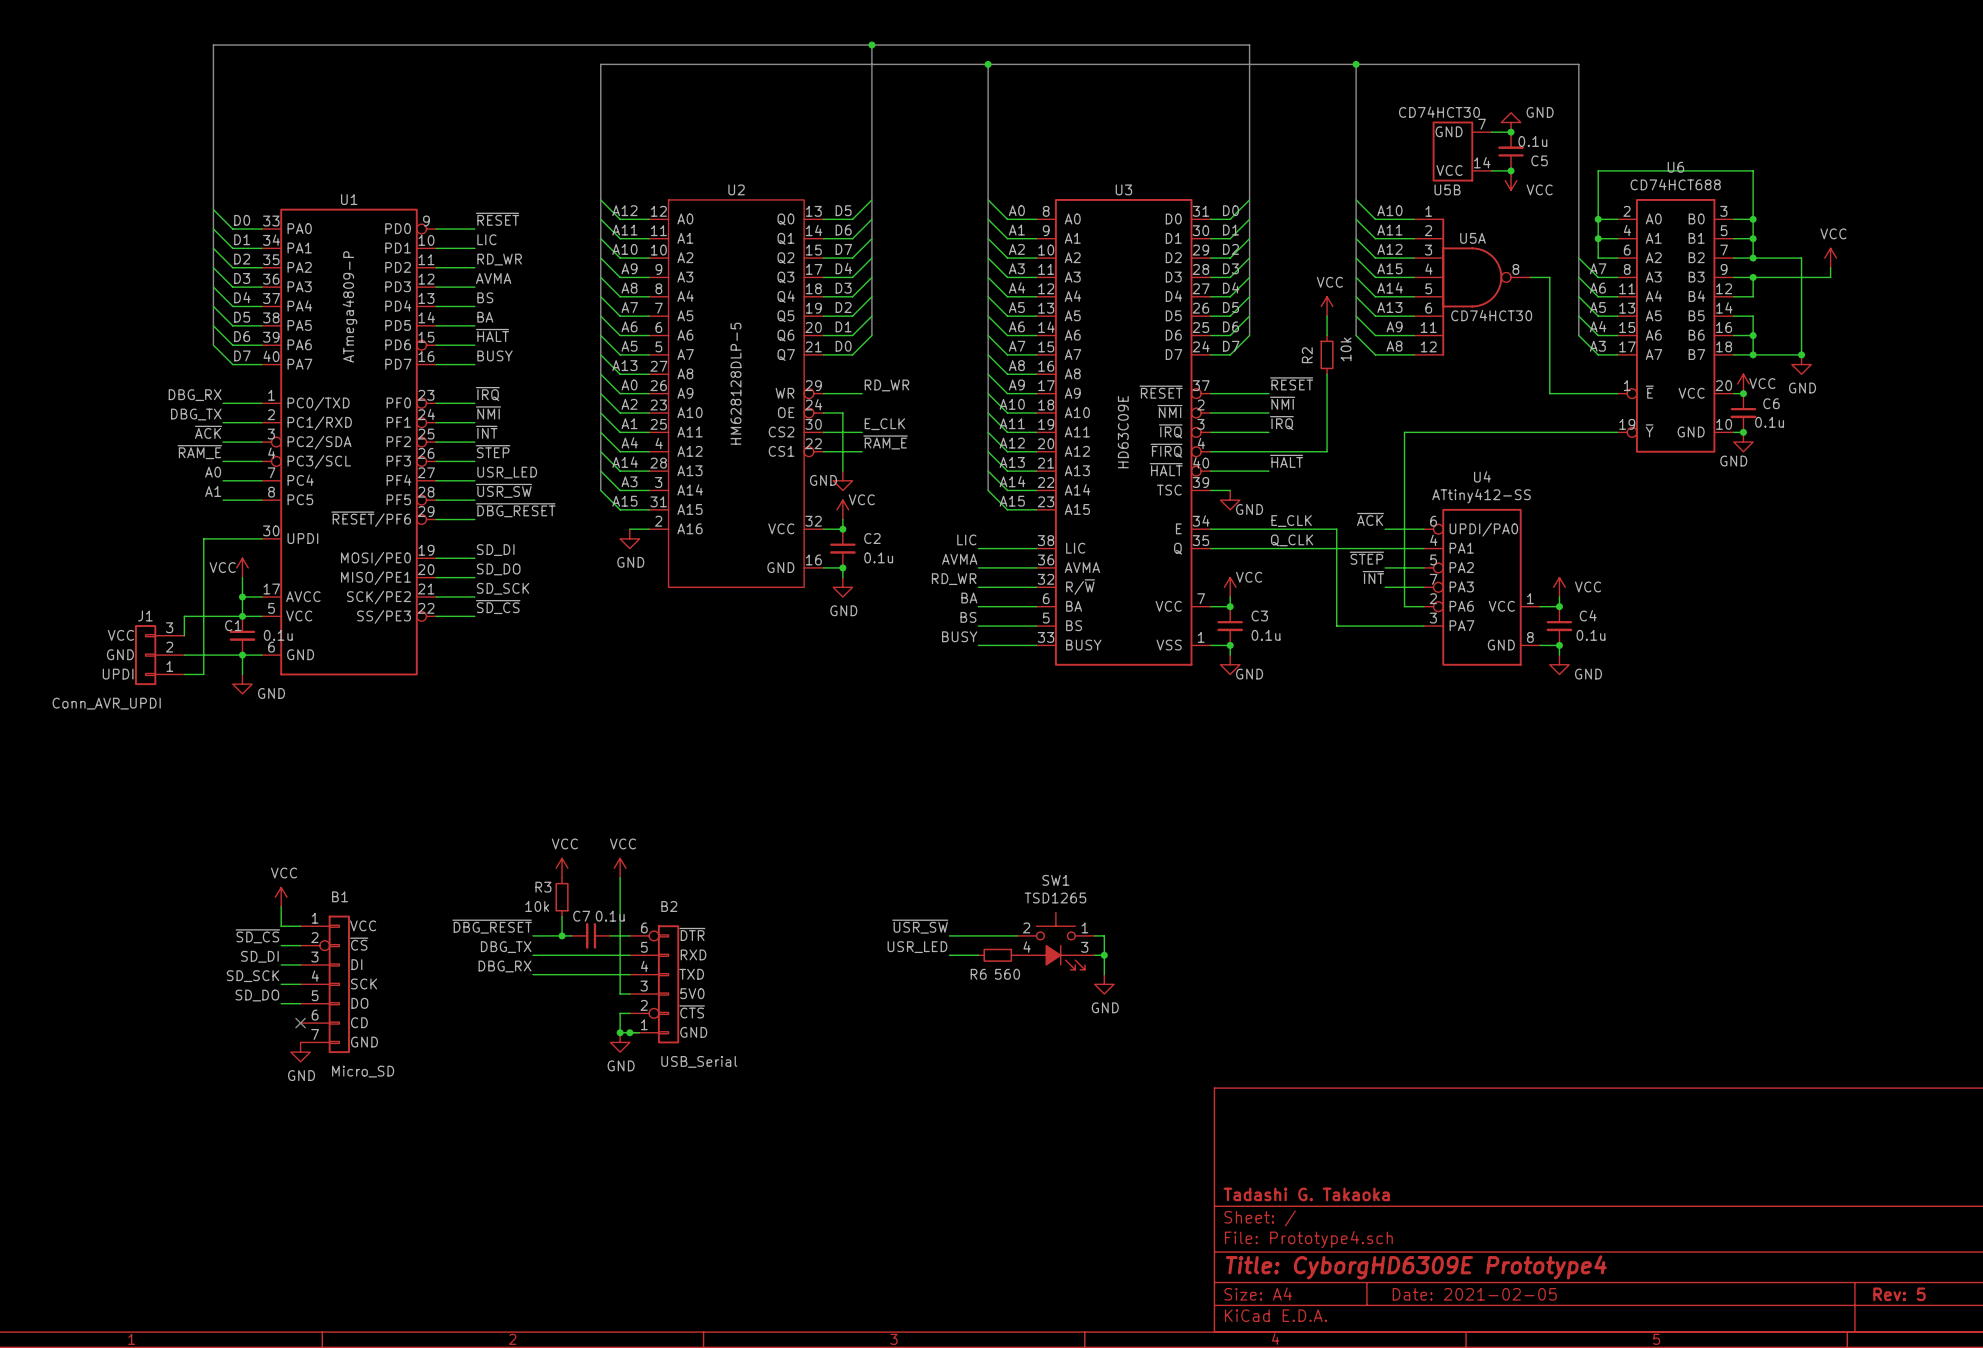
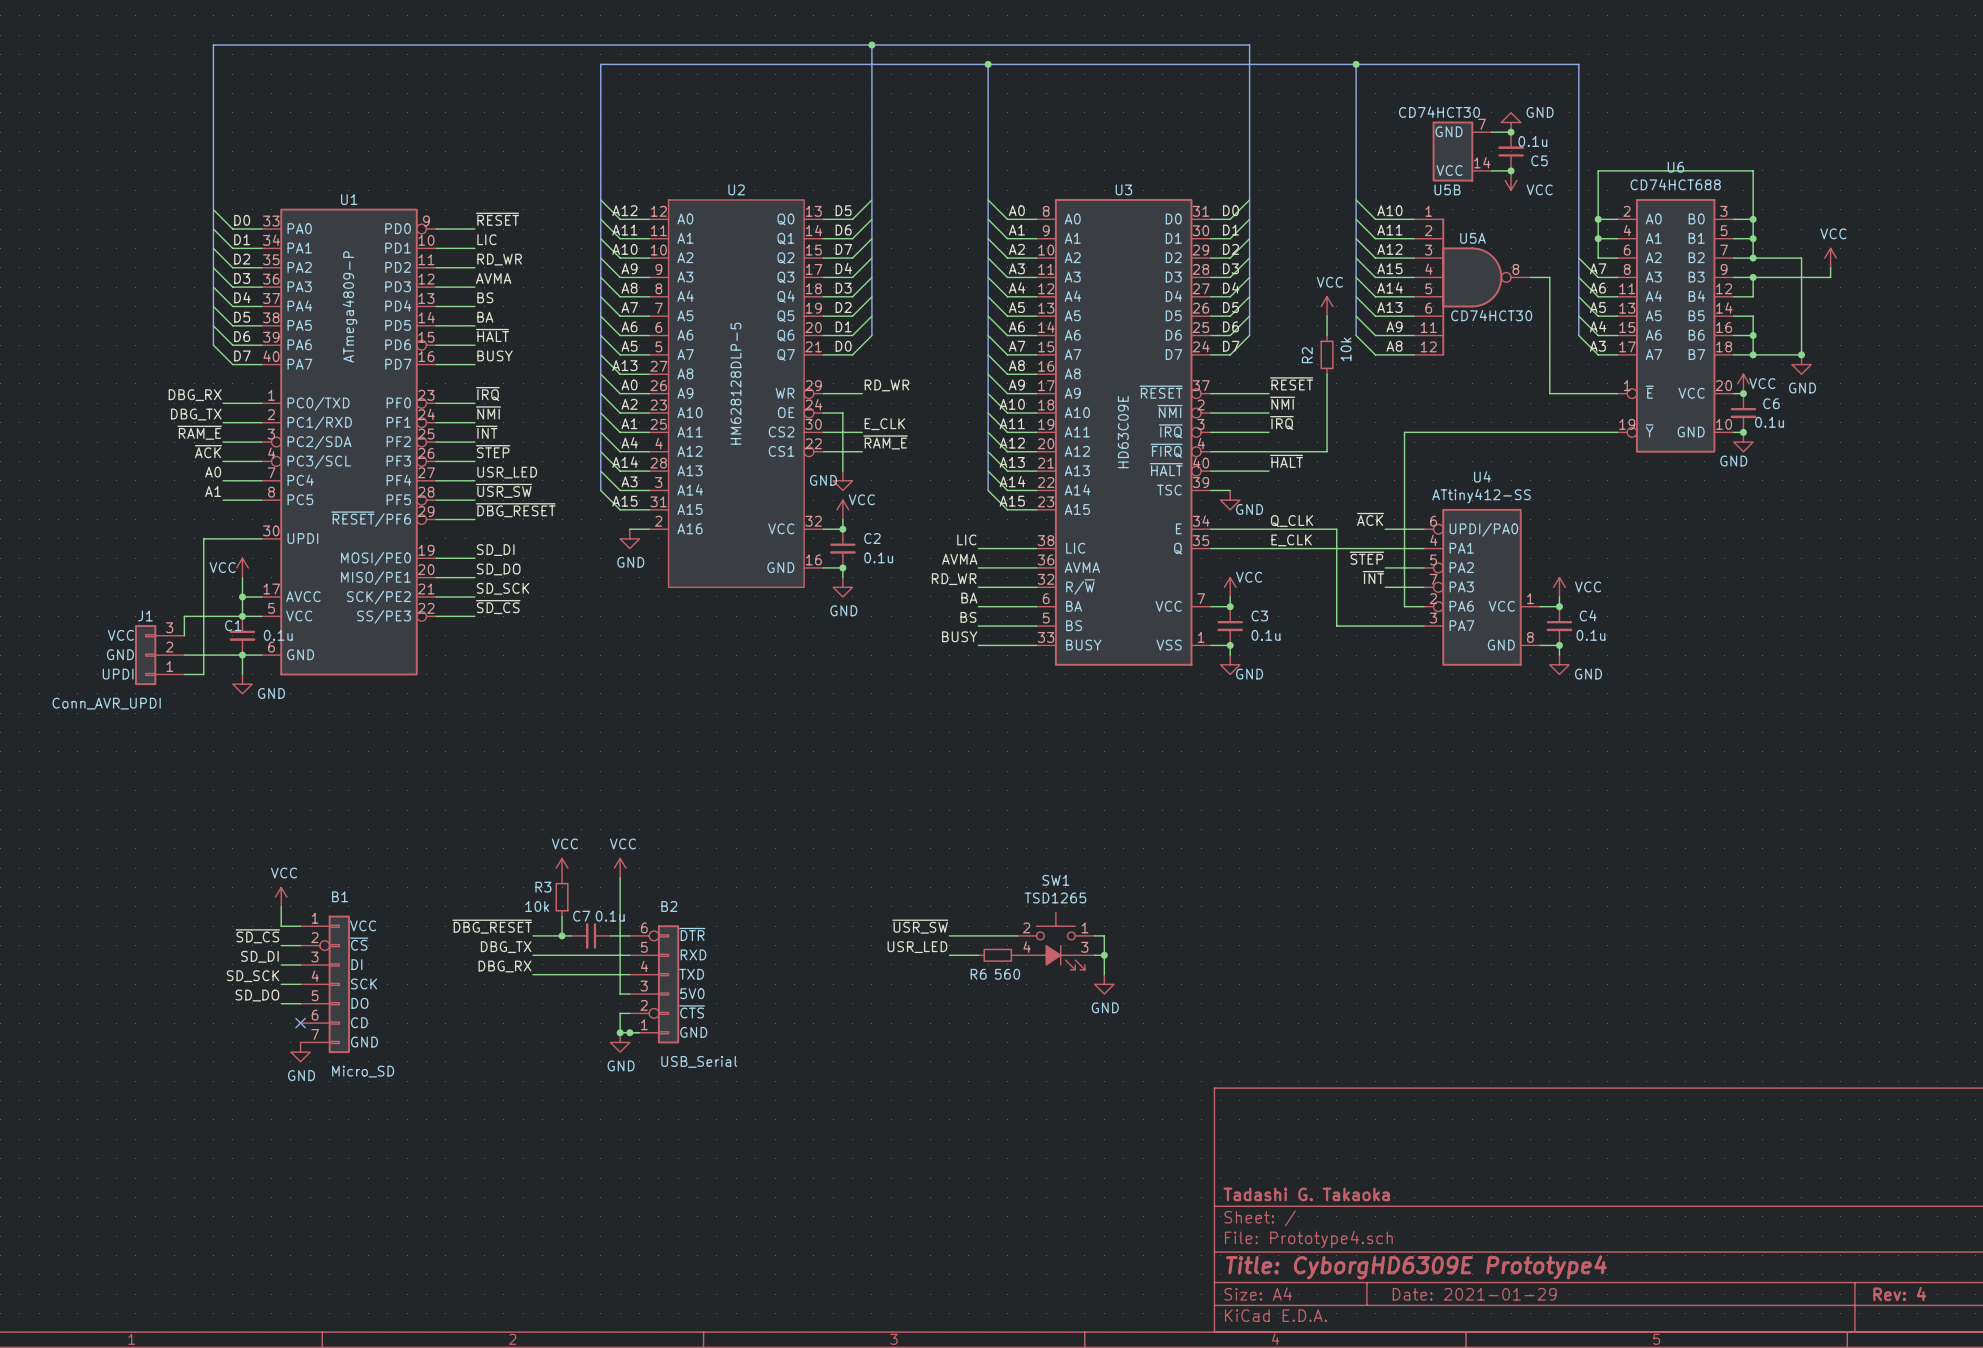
label: ~{ACK} (208, 432) -> ~{RAM_E} (199, 432)
label: ~{RAM_E} (199, 452) -> ~{ACK} (208, 451)
label: E_CLK (1291, 521) -> Q_CLK (1292, 521)
label: Q_CLK (1292, 540) -> E_CLK (1291, 540)
title block: Date: 2021-02-05 (1474, 1294) -> Date: 2021-01-29 (1474, 1294)
title block: Rev: 5 (1899, 1294) -> Rev: 4 (1899, 1294)

